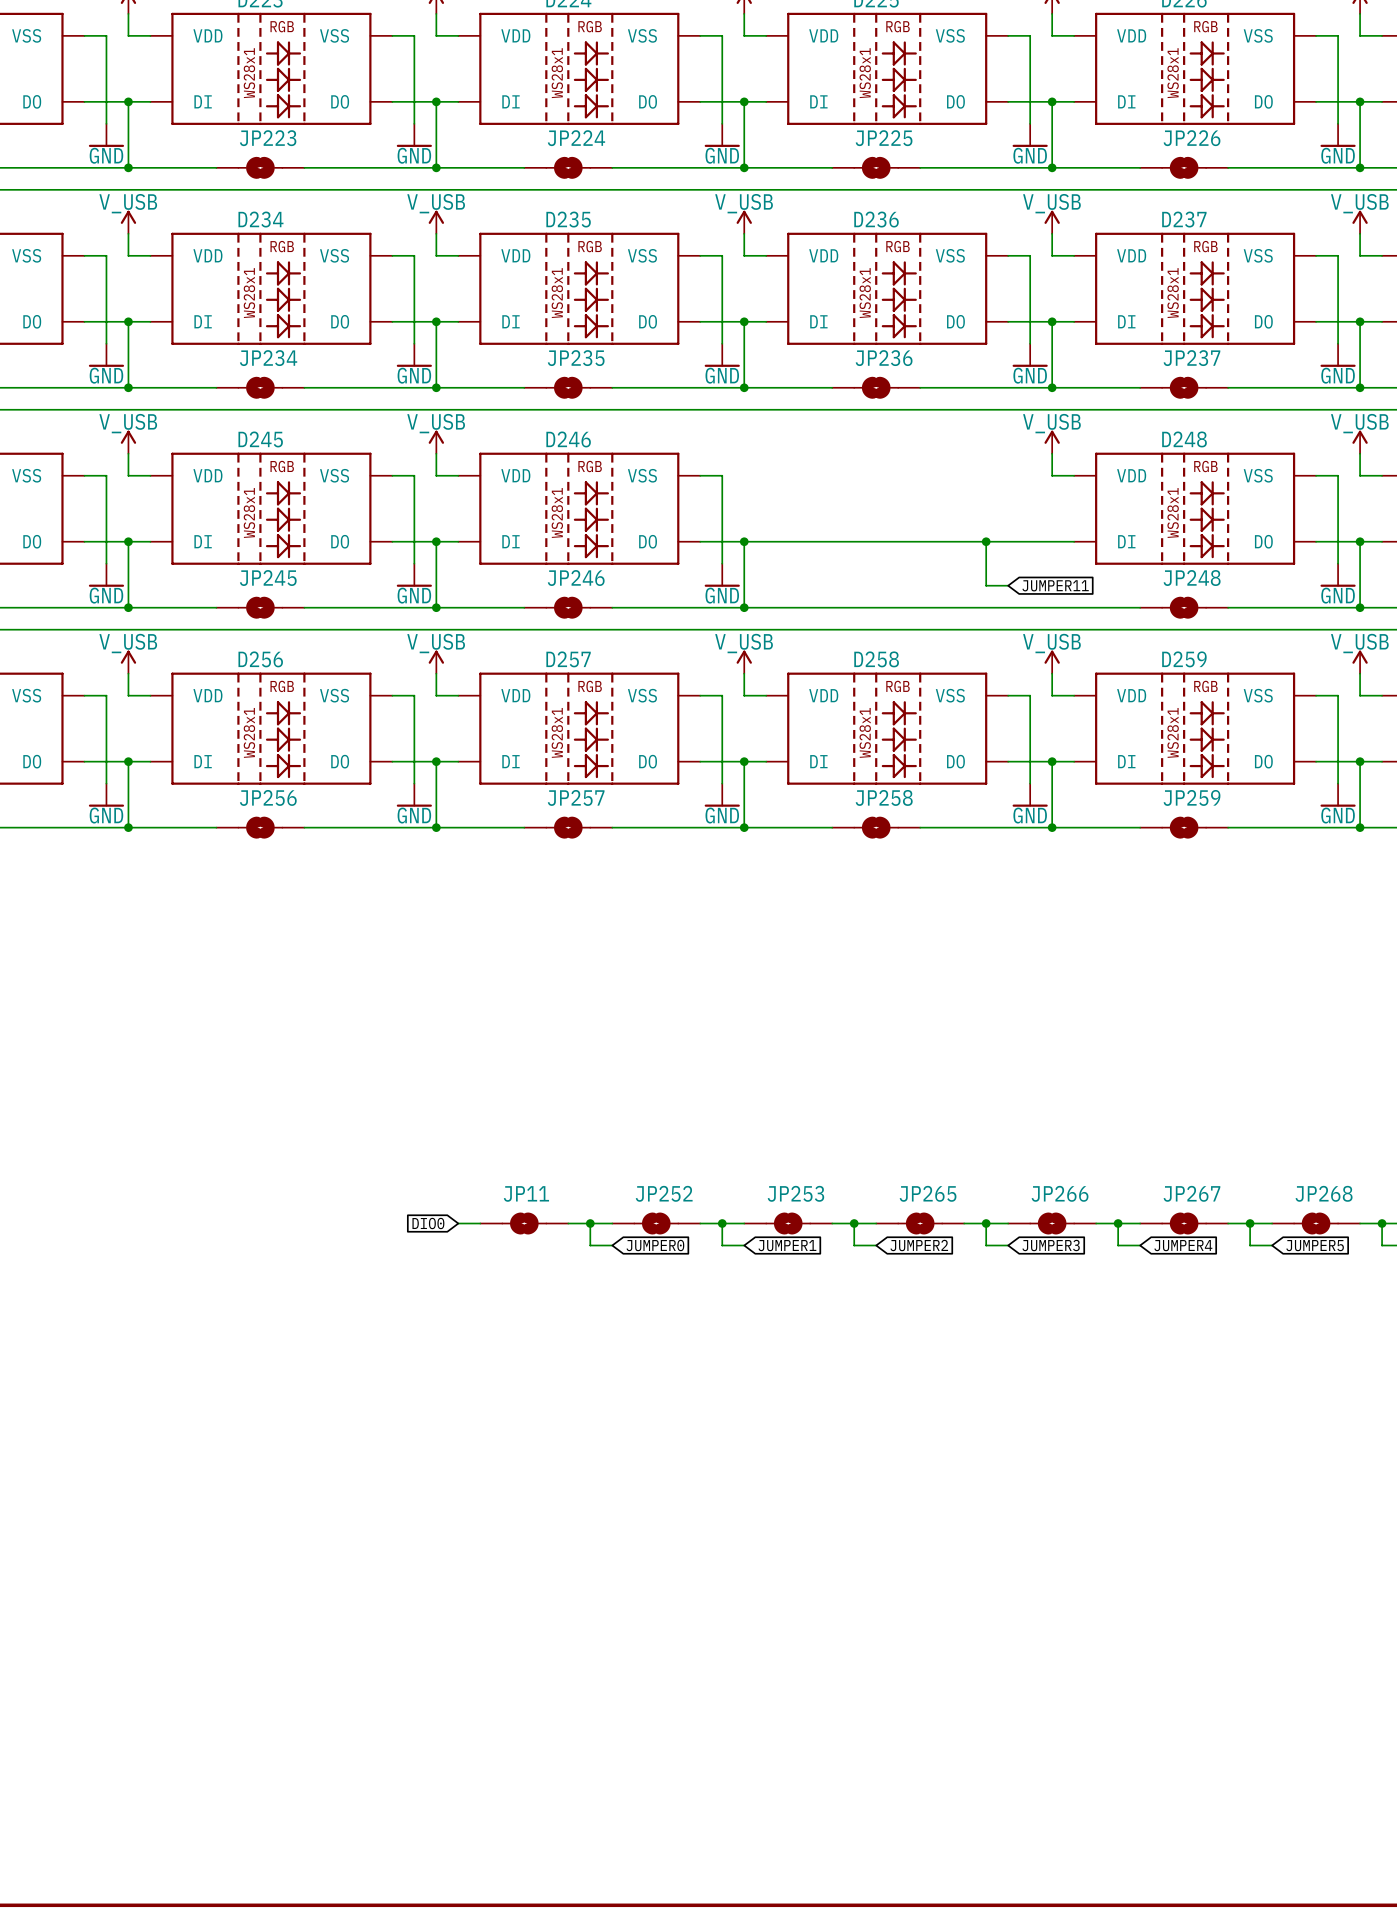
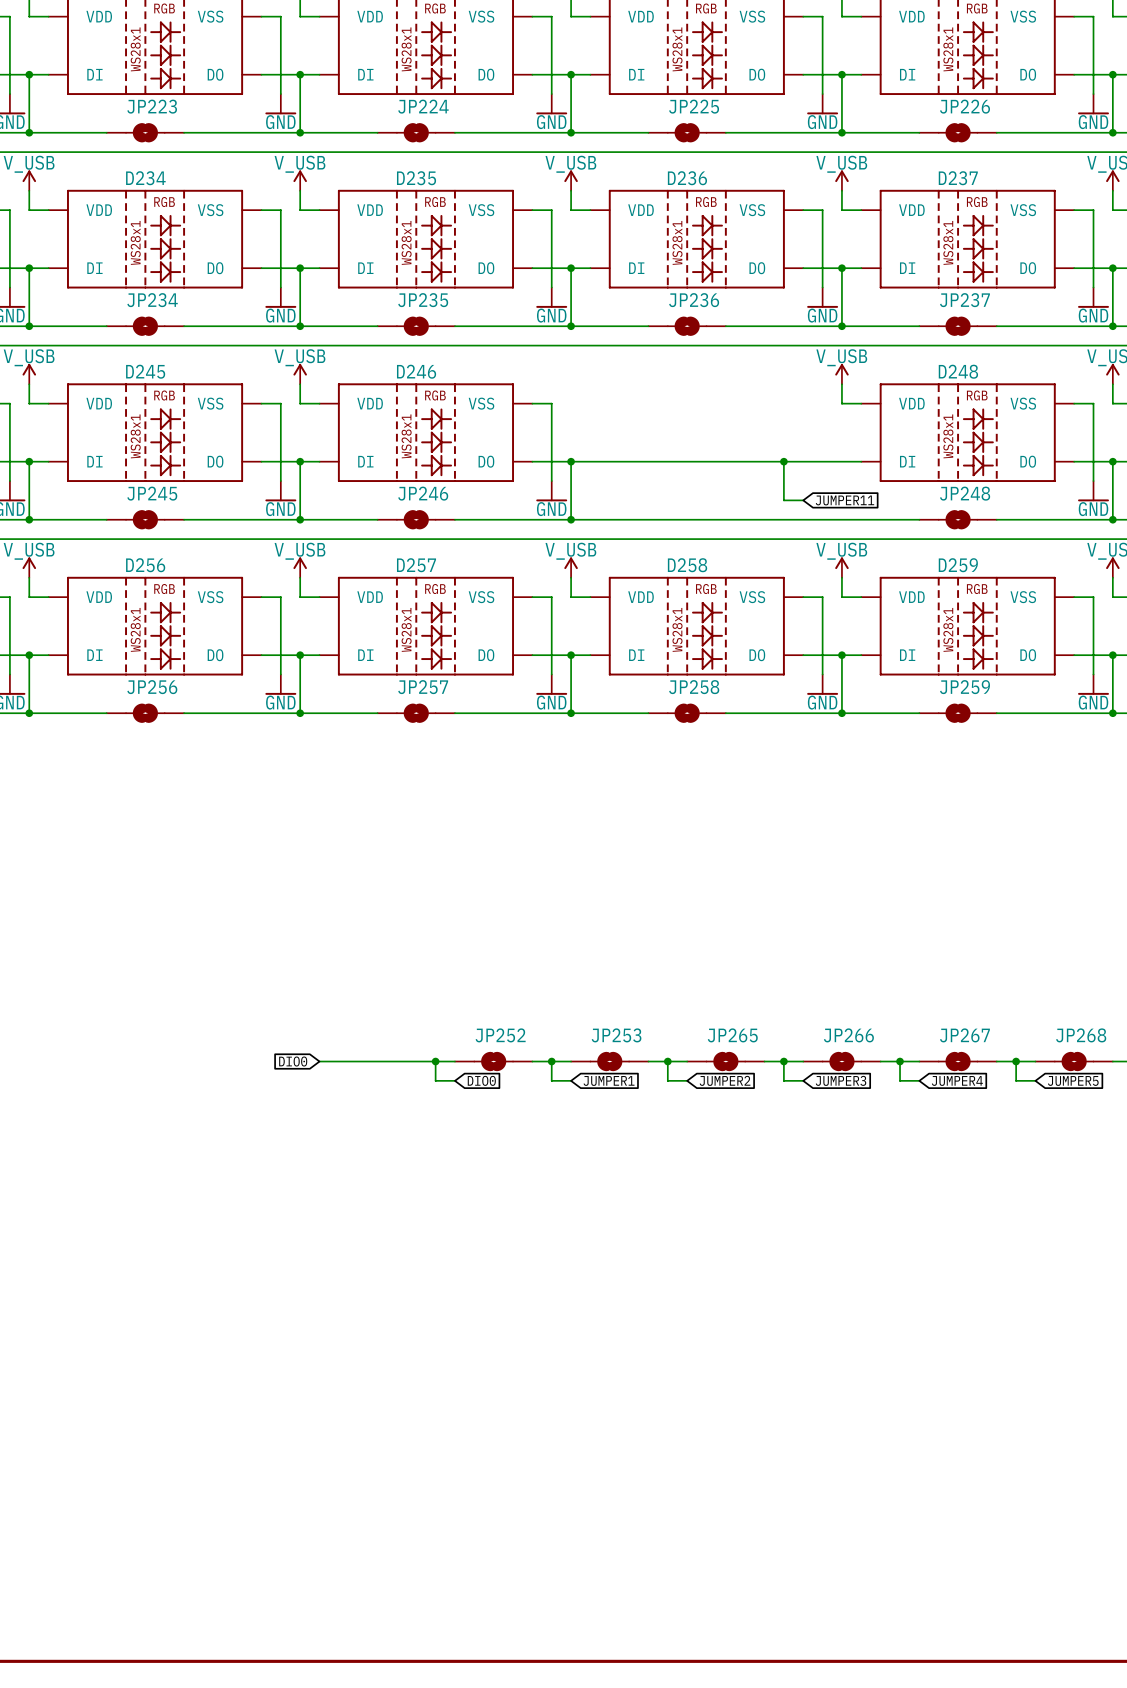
JP11: (524, 1223) -> none
global label: JUMPER0 (655, 1245) -> DIO0 (481, 1080)

